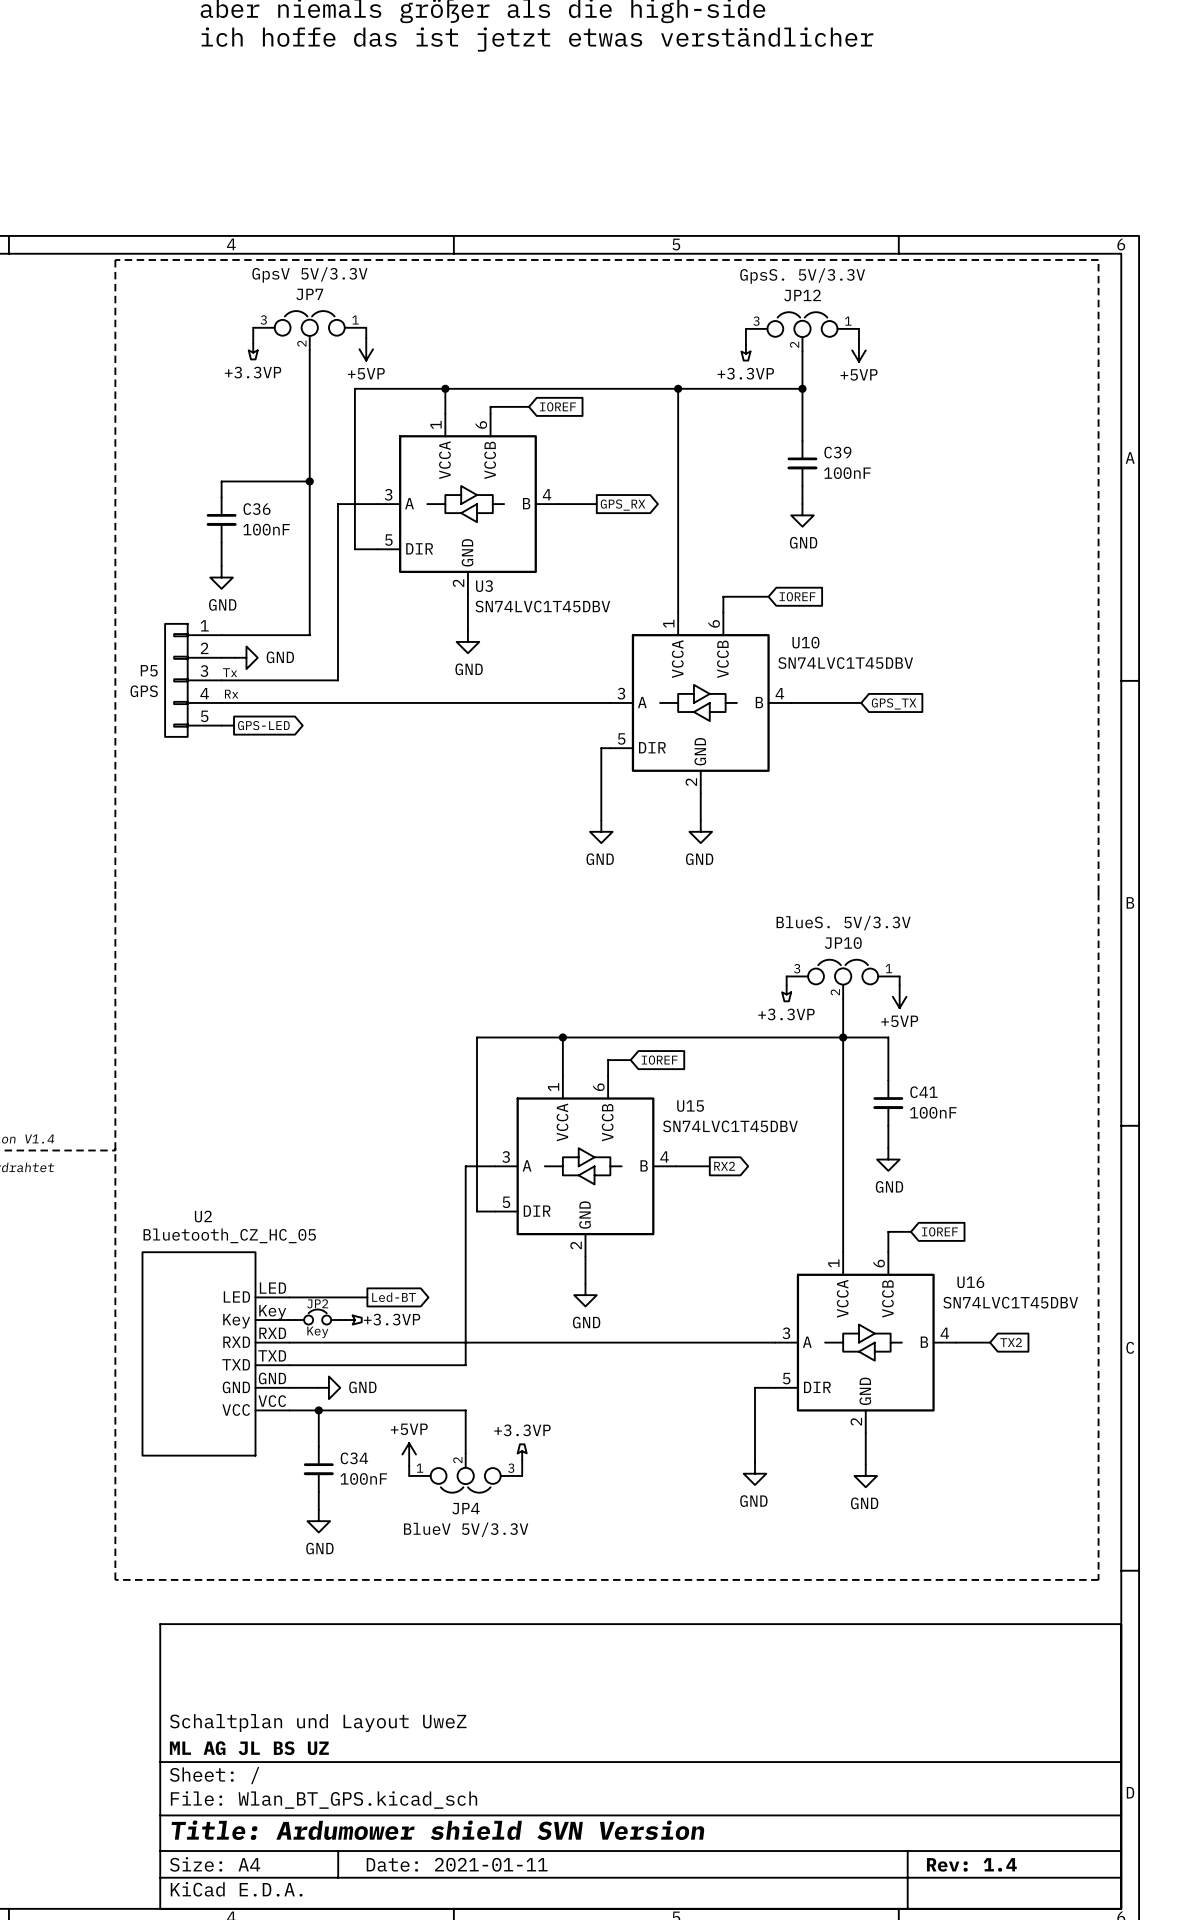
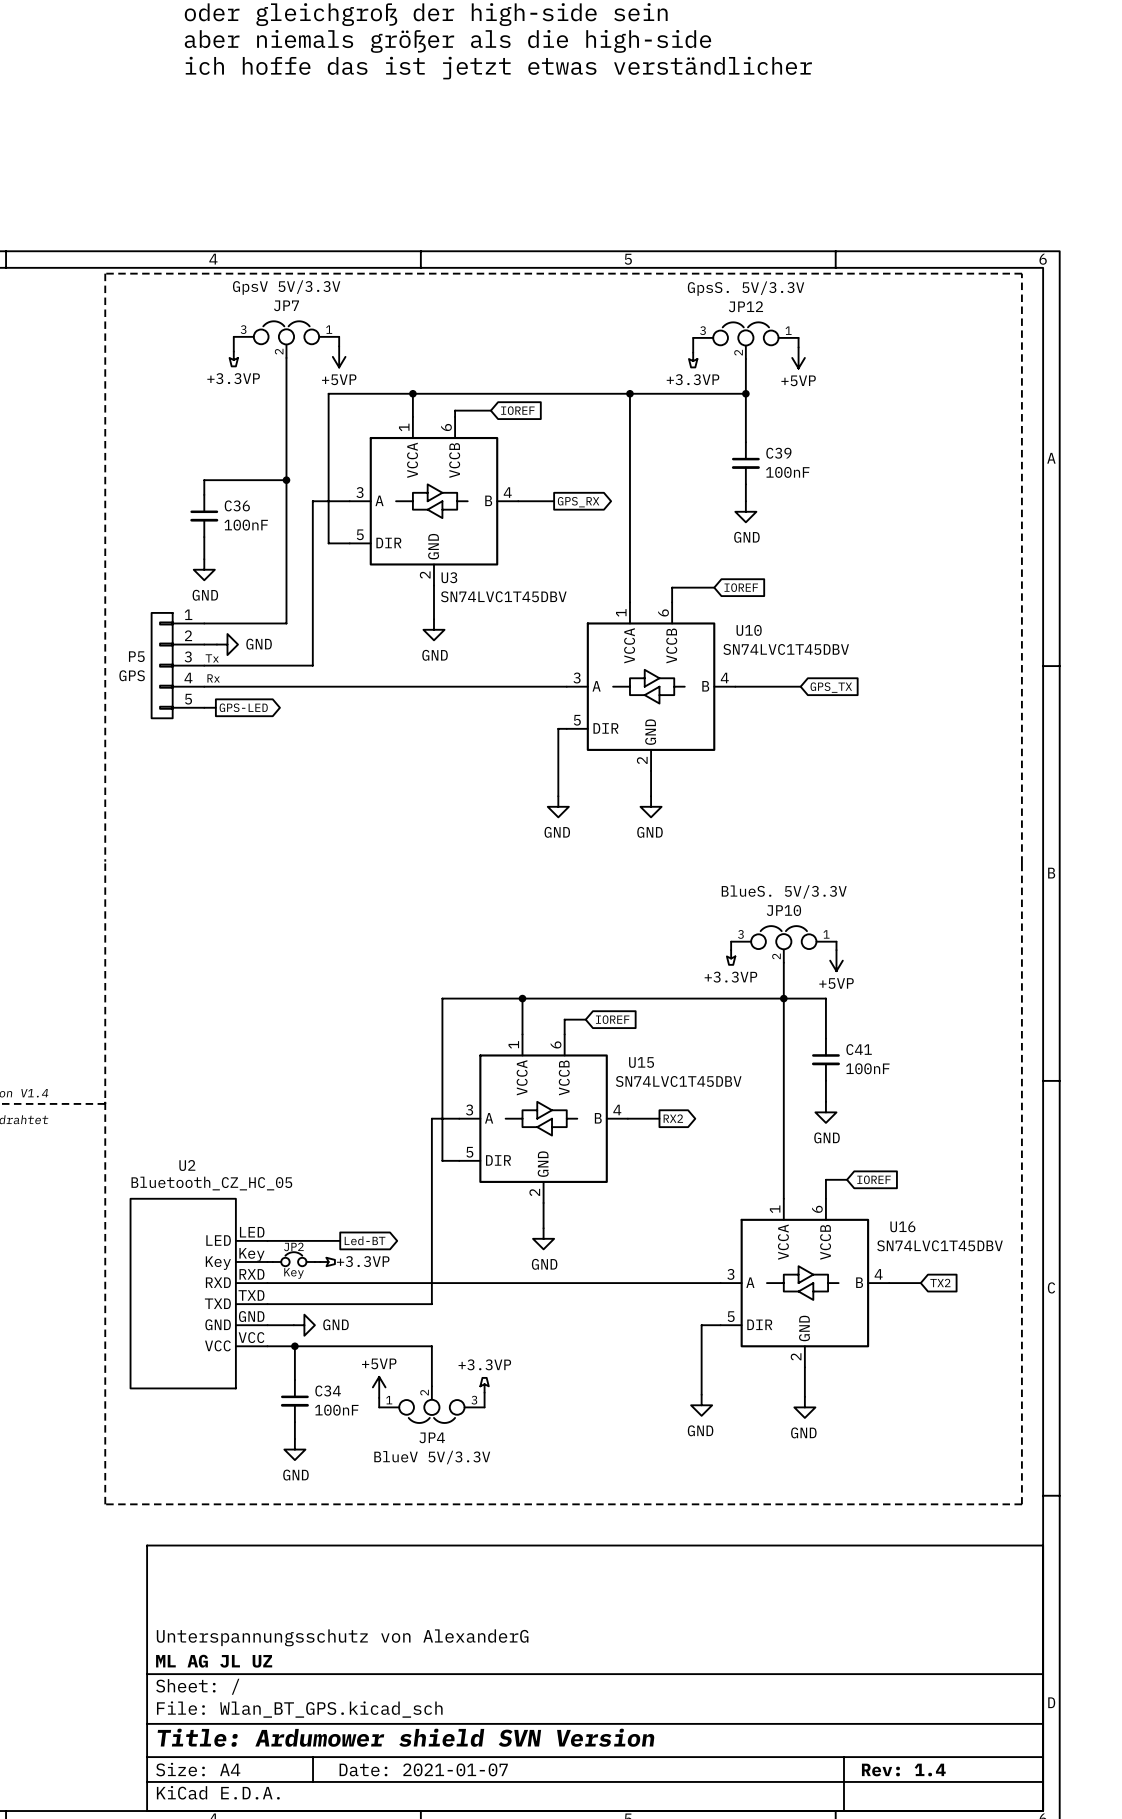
title block: Schaltplan und Layout UweZ (318, 1723) -> Unterspannungsschutz von AlexanderG (342, 1637)
title block: ML AG JL BS UZ (249, 1748) -> ML AG JL UZ (214, 1661)
title block: Date: 2021-01-11 (457, 1864) -> Date: 2021-01-07 (423, 1769)

